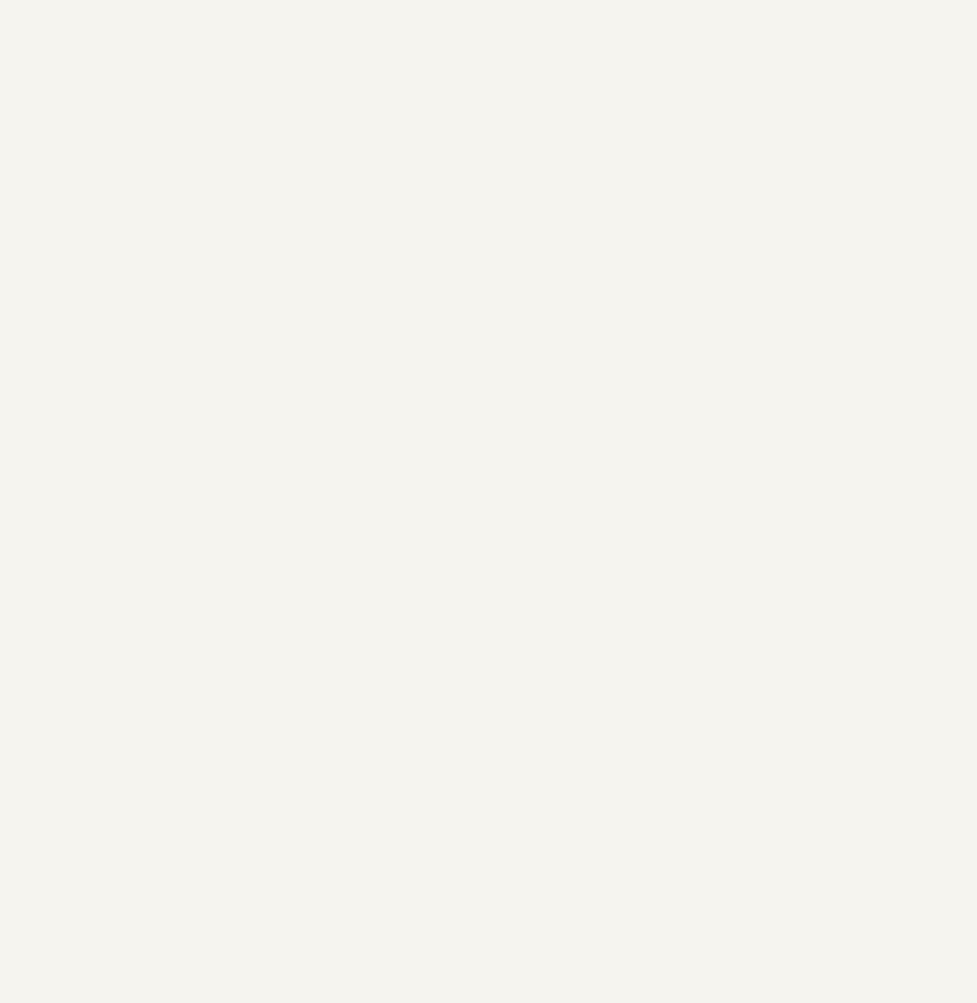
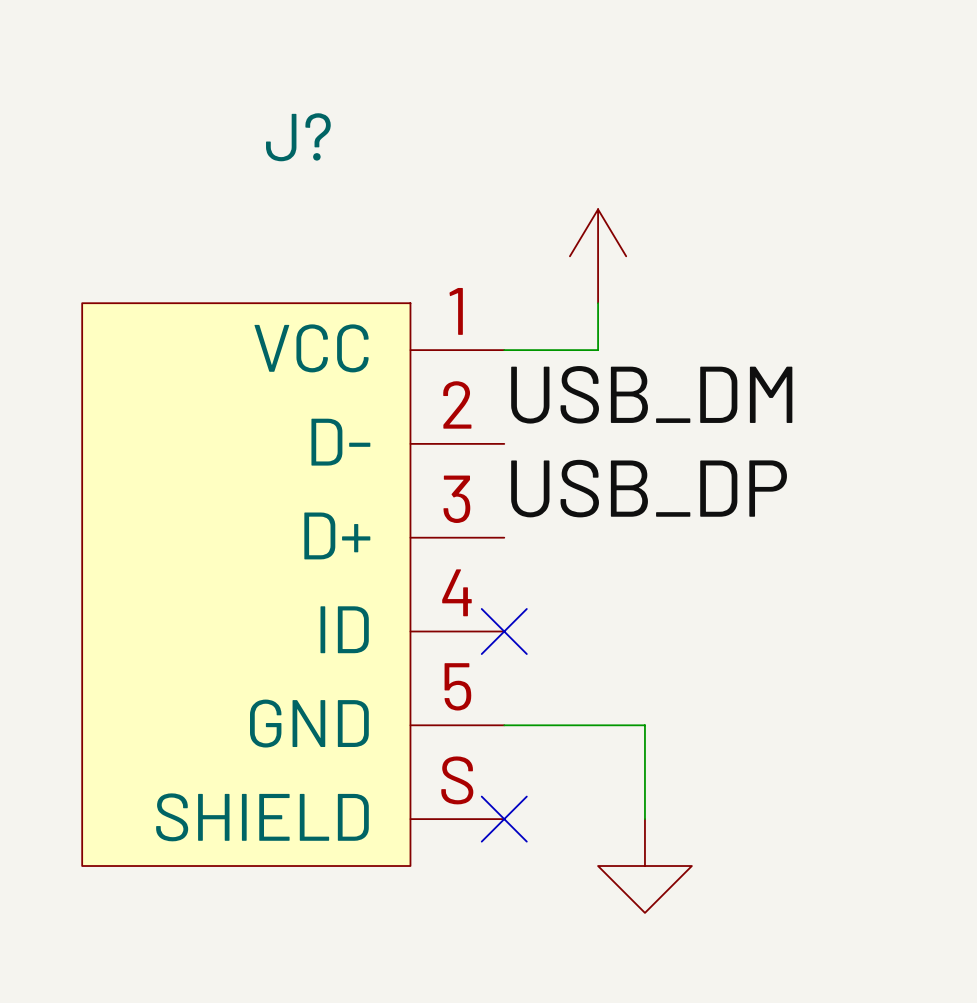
power symbol: none -> (598, 256)
wire: none -> (598, 303) (598, 350) (504, 350)
label: none -> USB_DM (651, 394)
label: none -> USB_DP (649, 488)
J?: none -> (293, 584)
no-connect mark: none -> (504, 631)
wire: none -> (504, 725) (644, 725) (644, 819)
no-connect mark: none -> (504, 819)
power symbol: none -> (644, 866)

